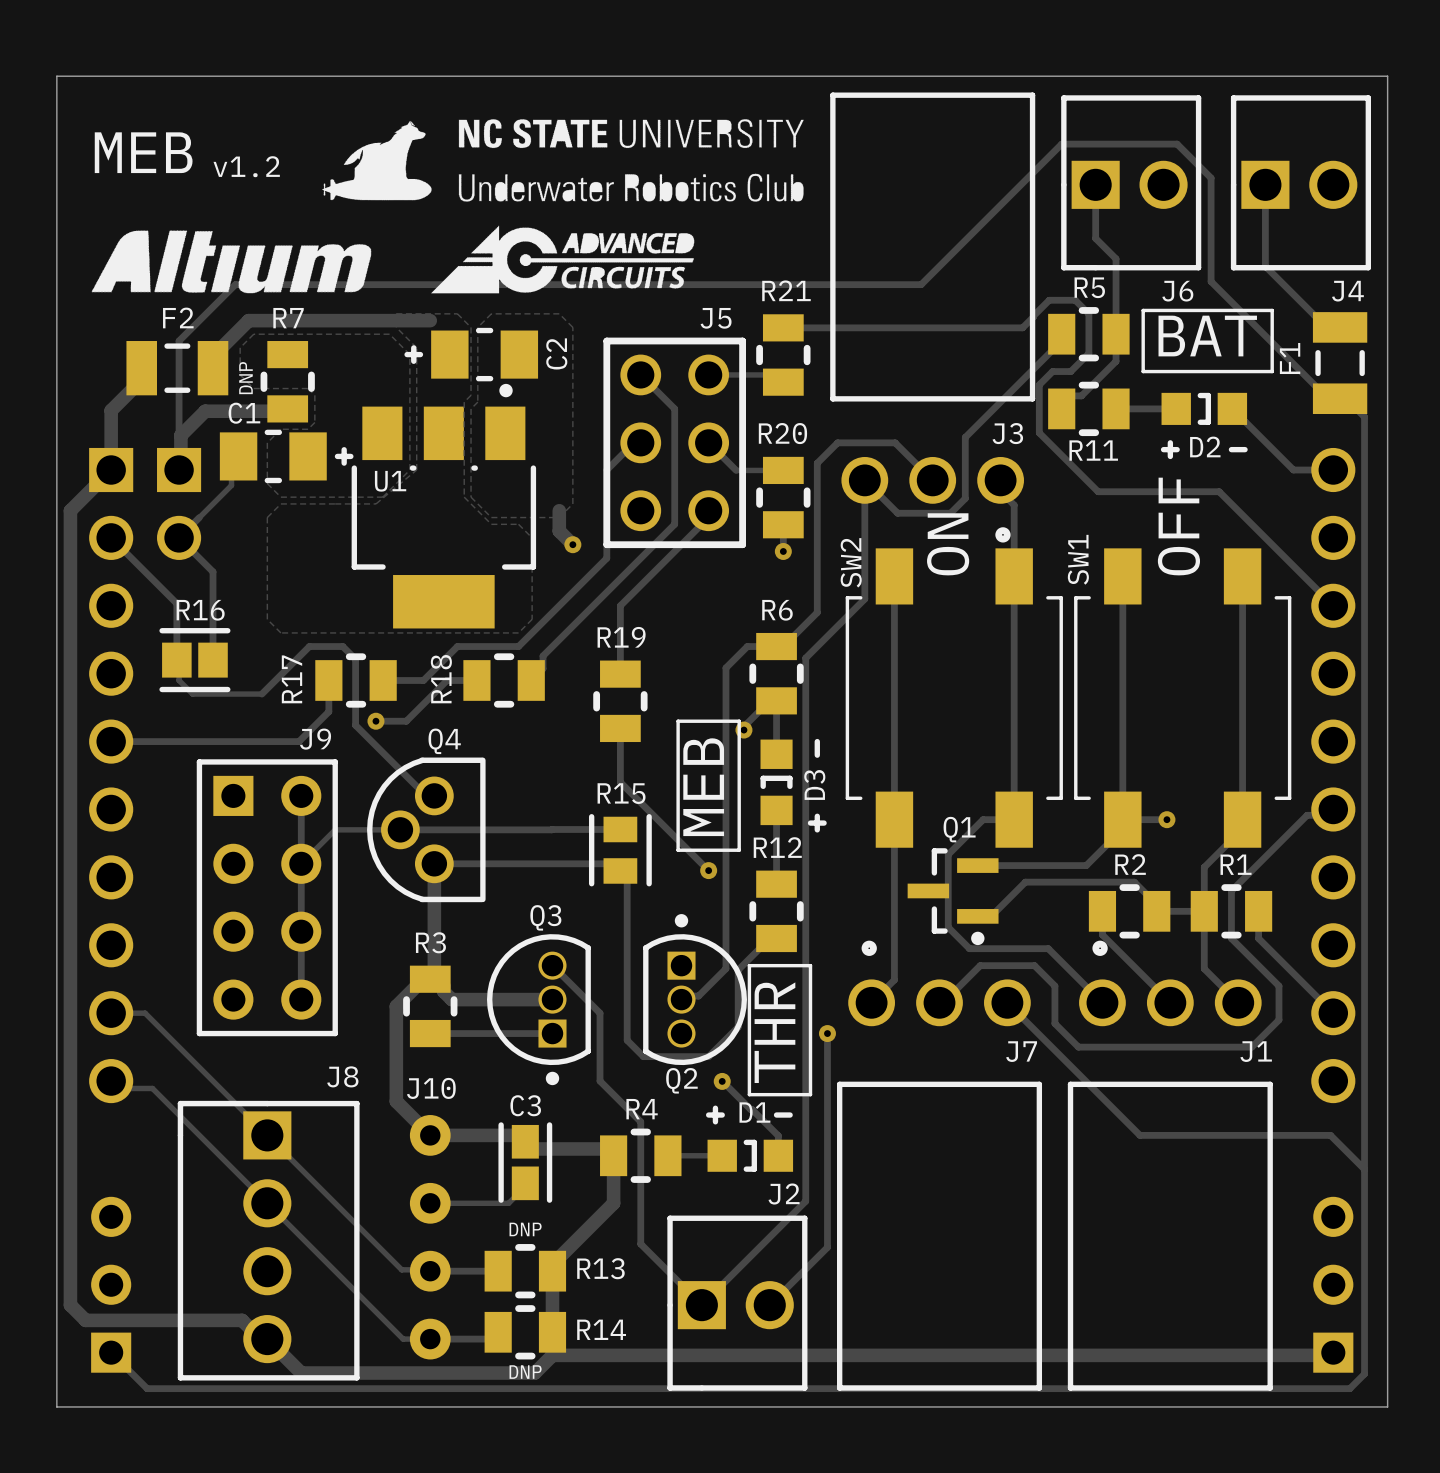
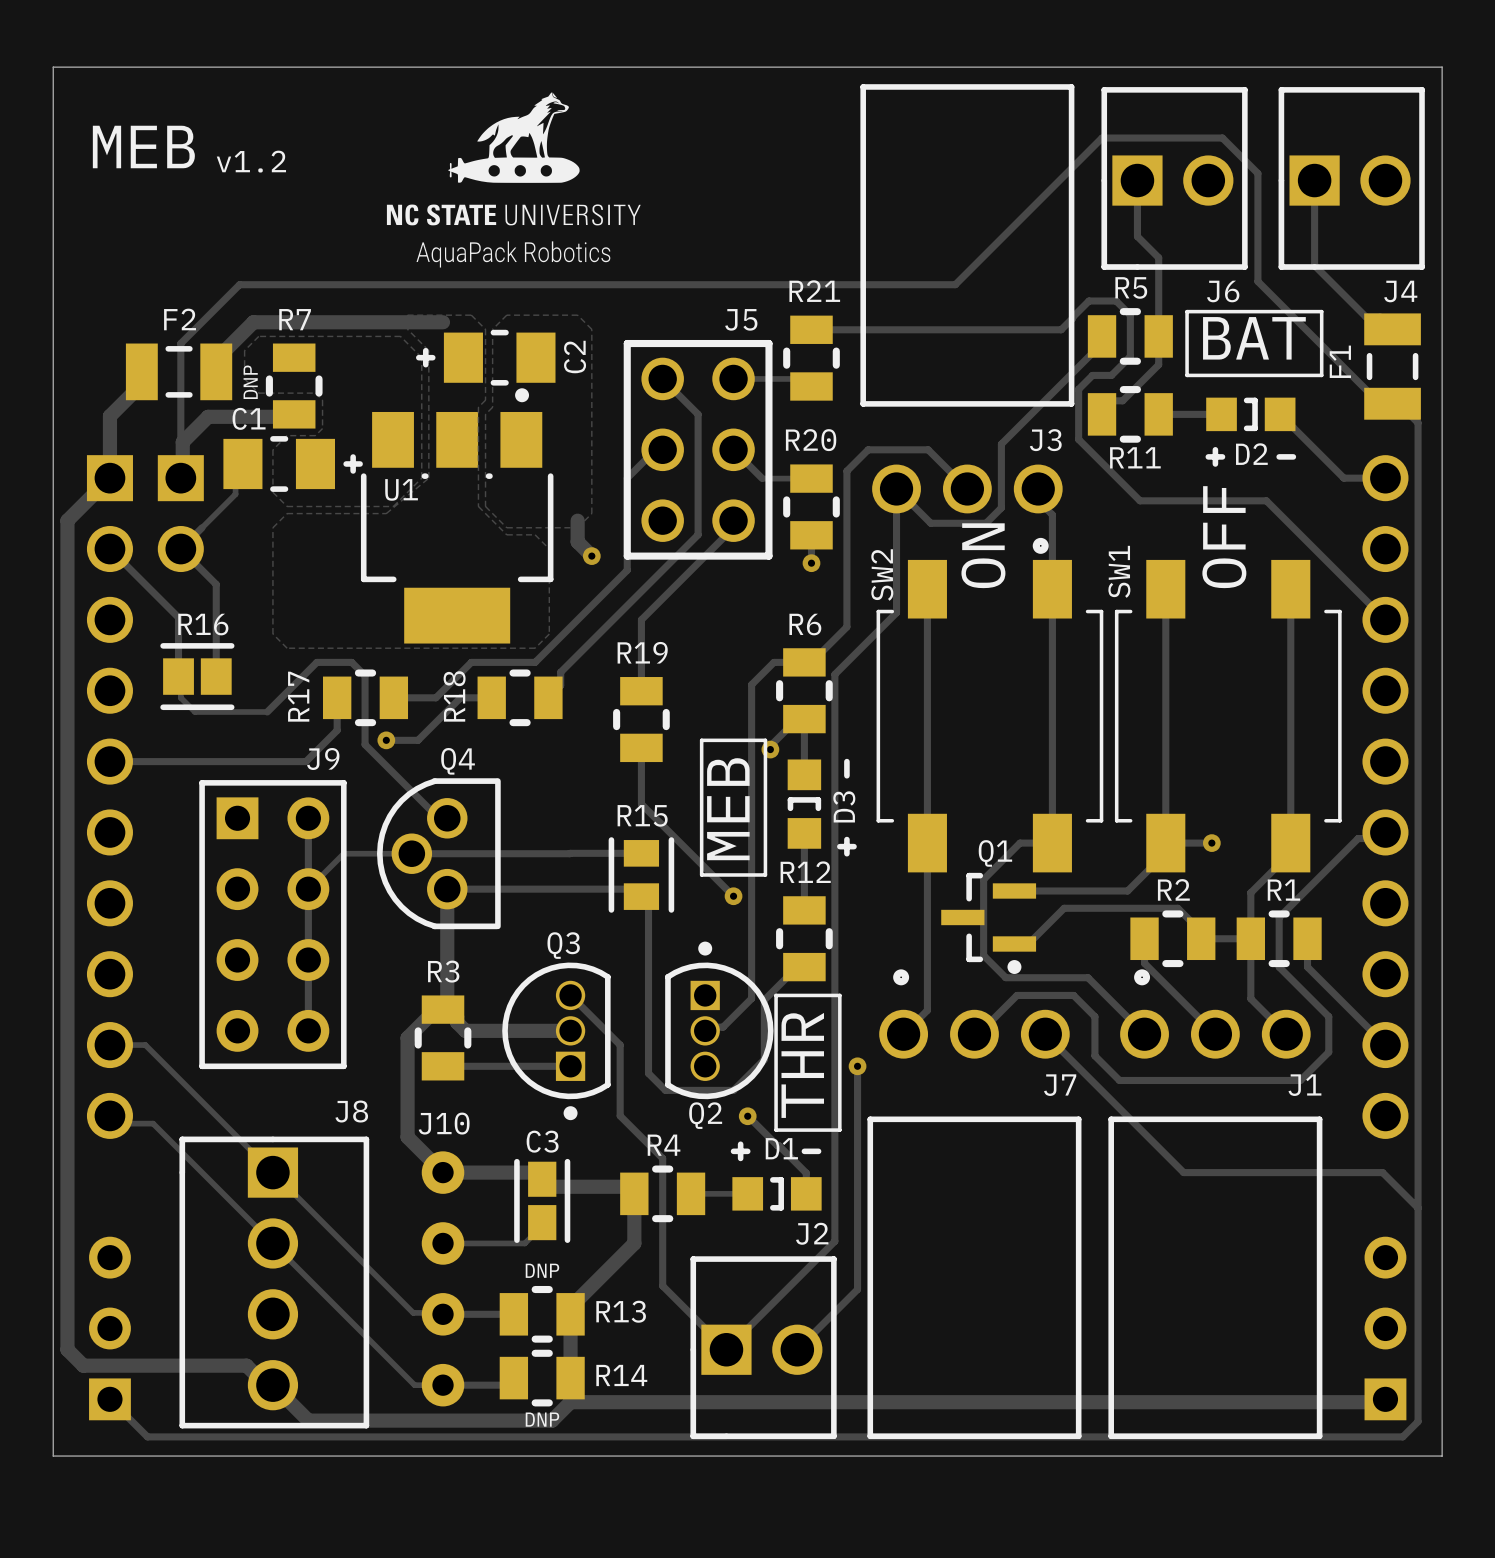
drawing: [322, 119, 804, 294] -> none
drawing shape: [494, 174, 508, 202] -> [386, 92, 641, 268]
drawing: [91, 230, 372, 294] -> none

